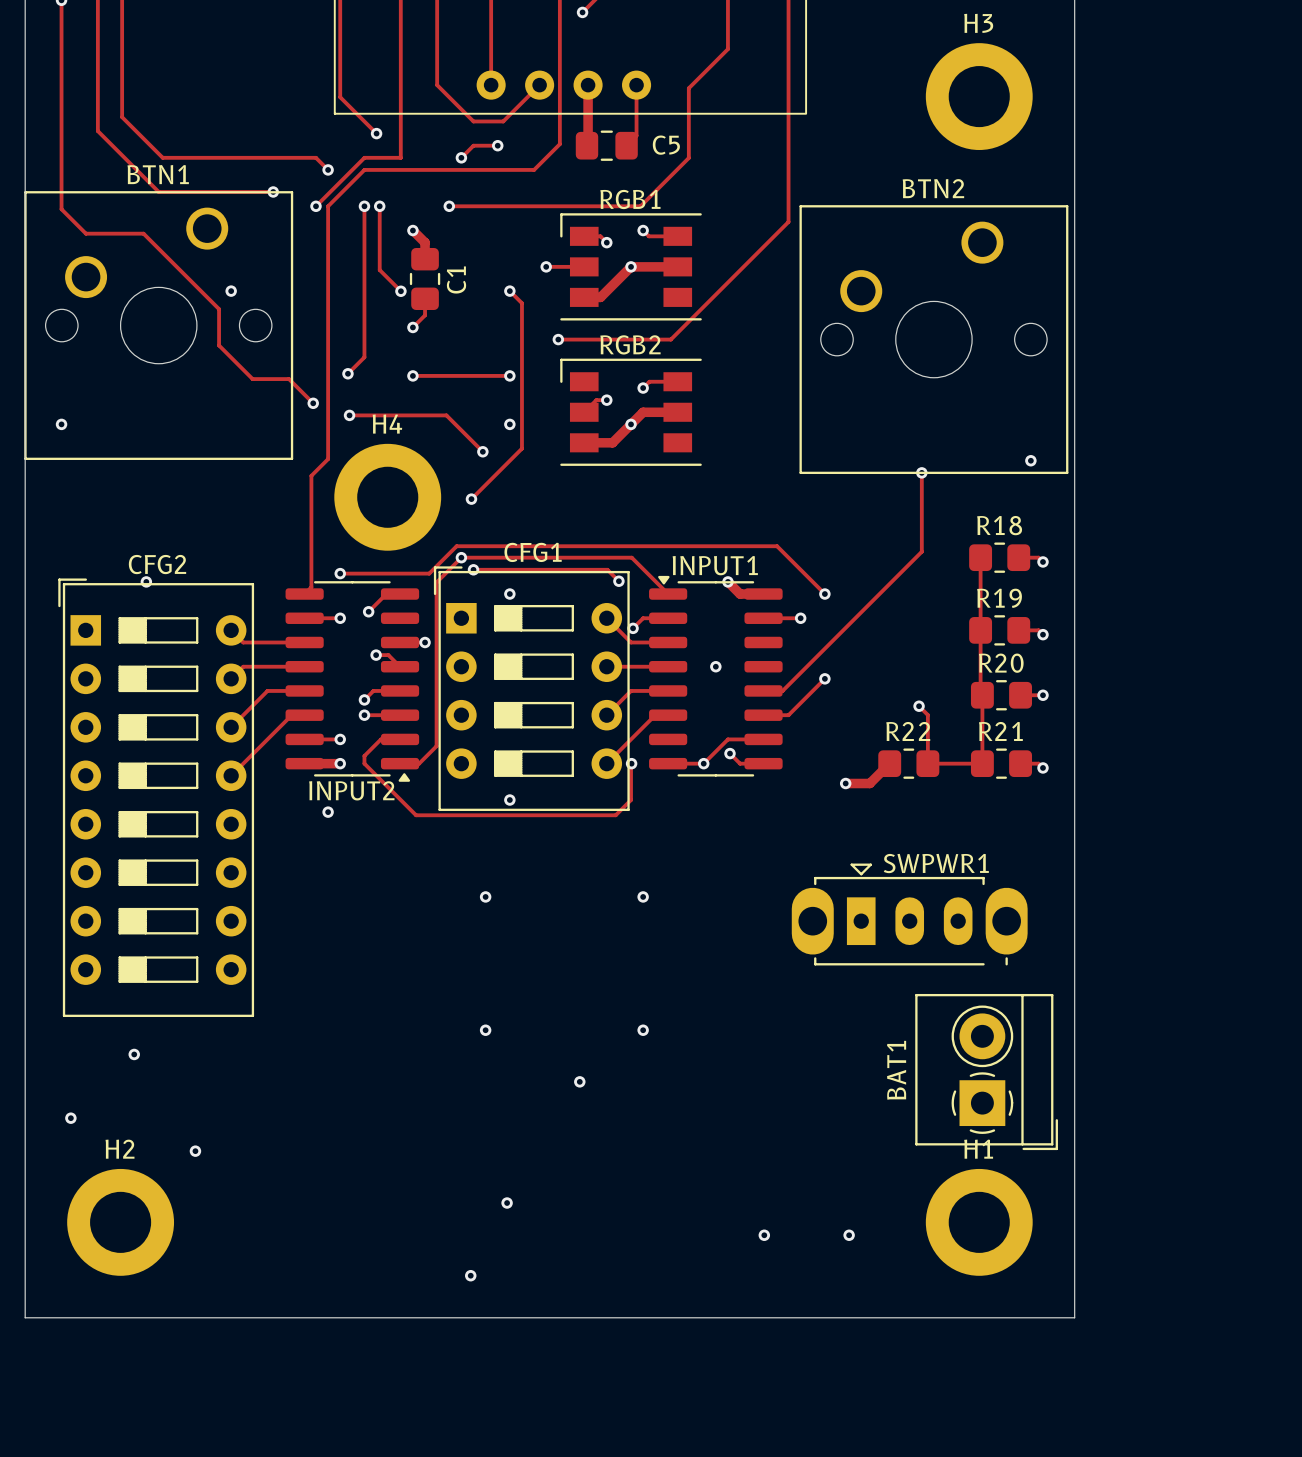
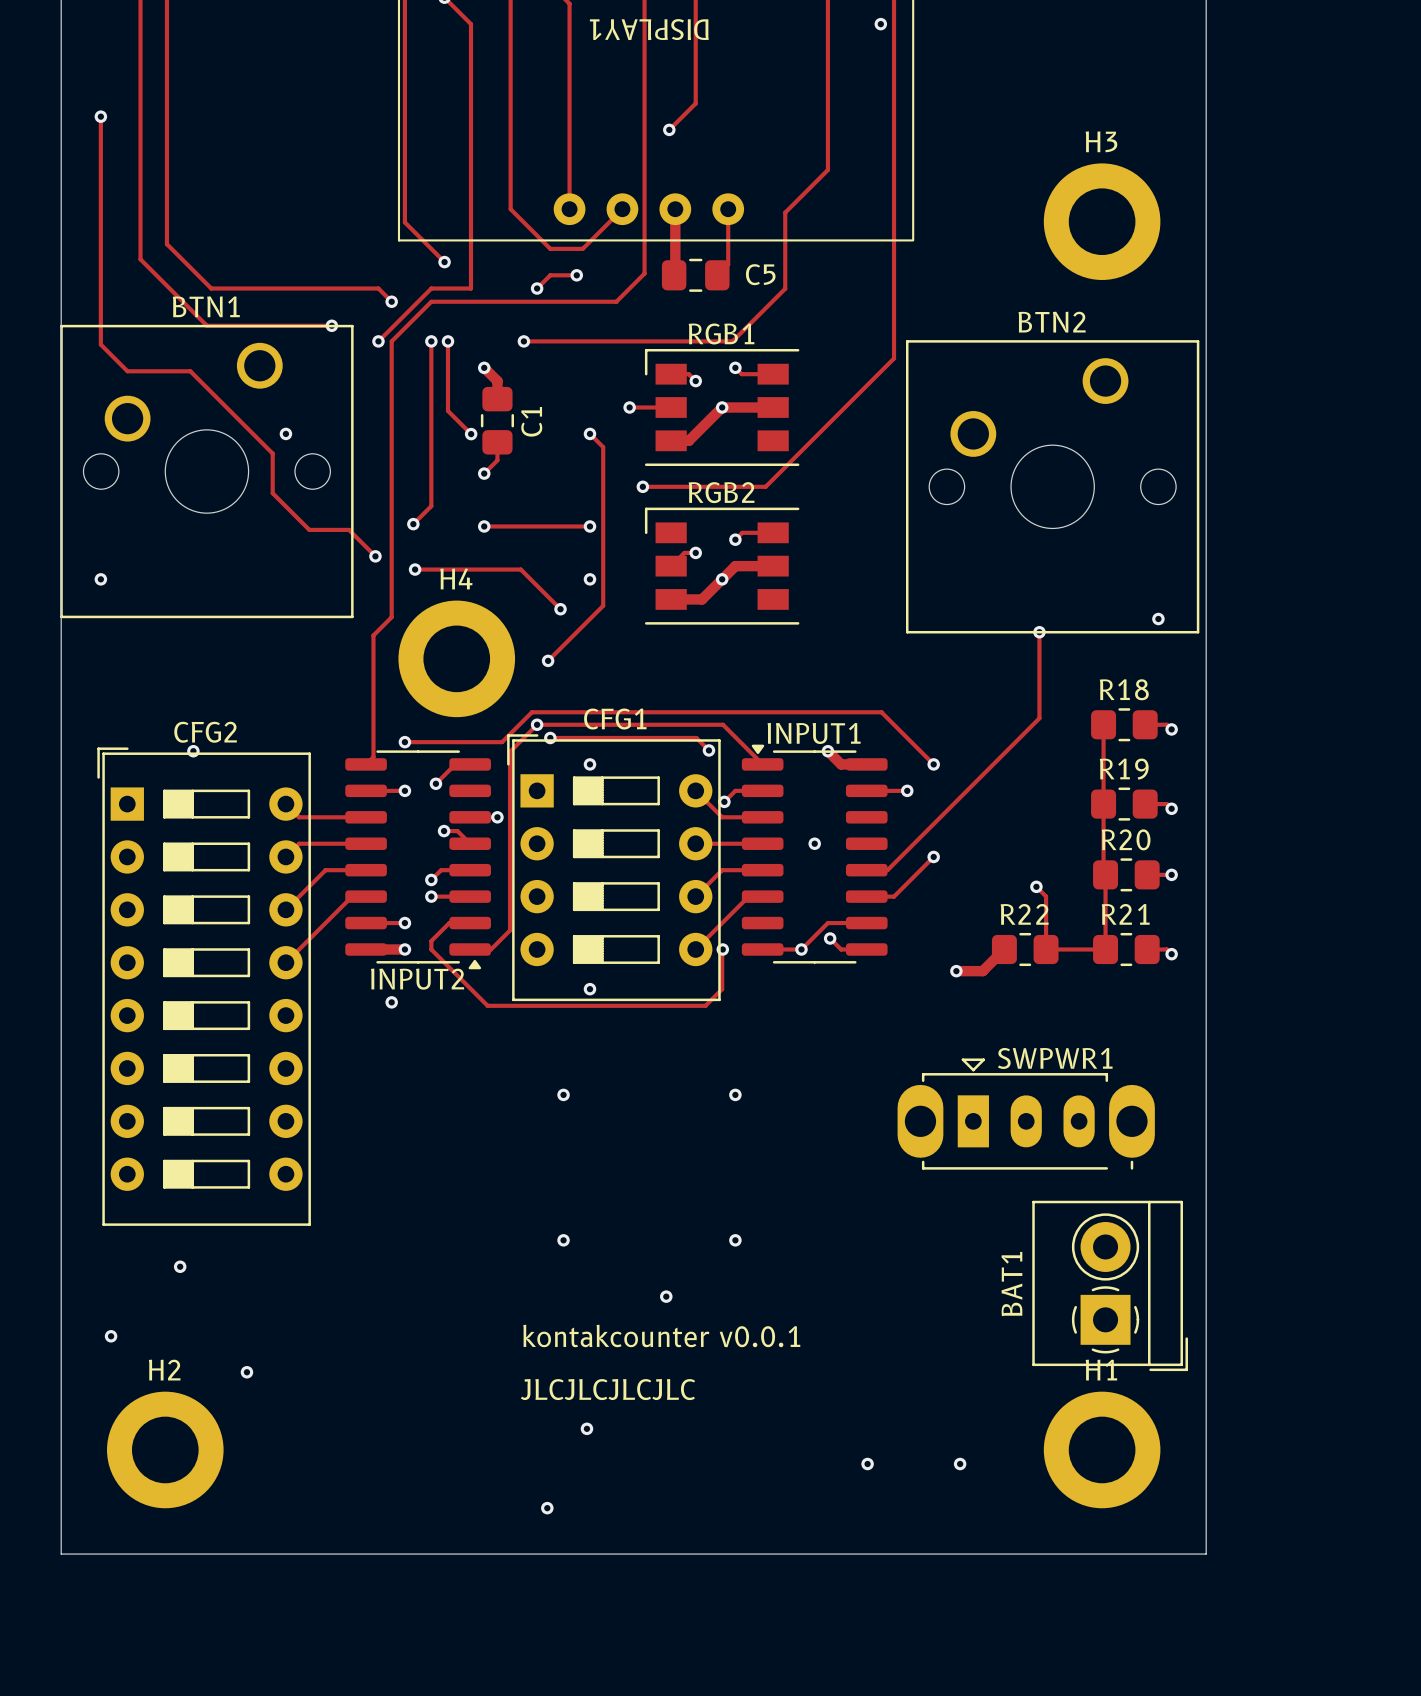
text: none -> kontakcounter v0.0.1 (661, 1336)
text: none -> JLCJLCJLCJLC (607, 1389)

